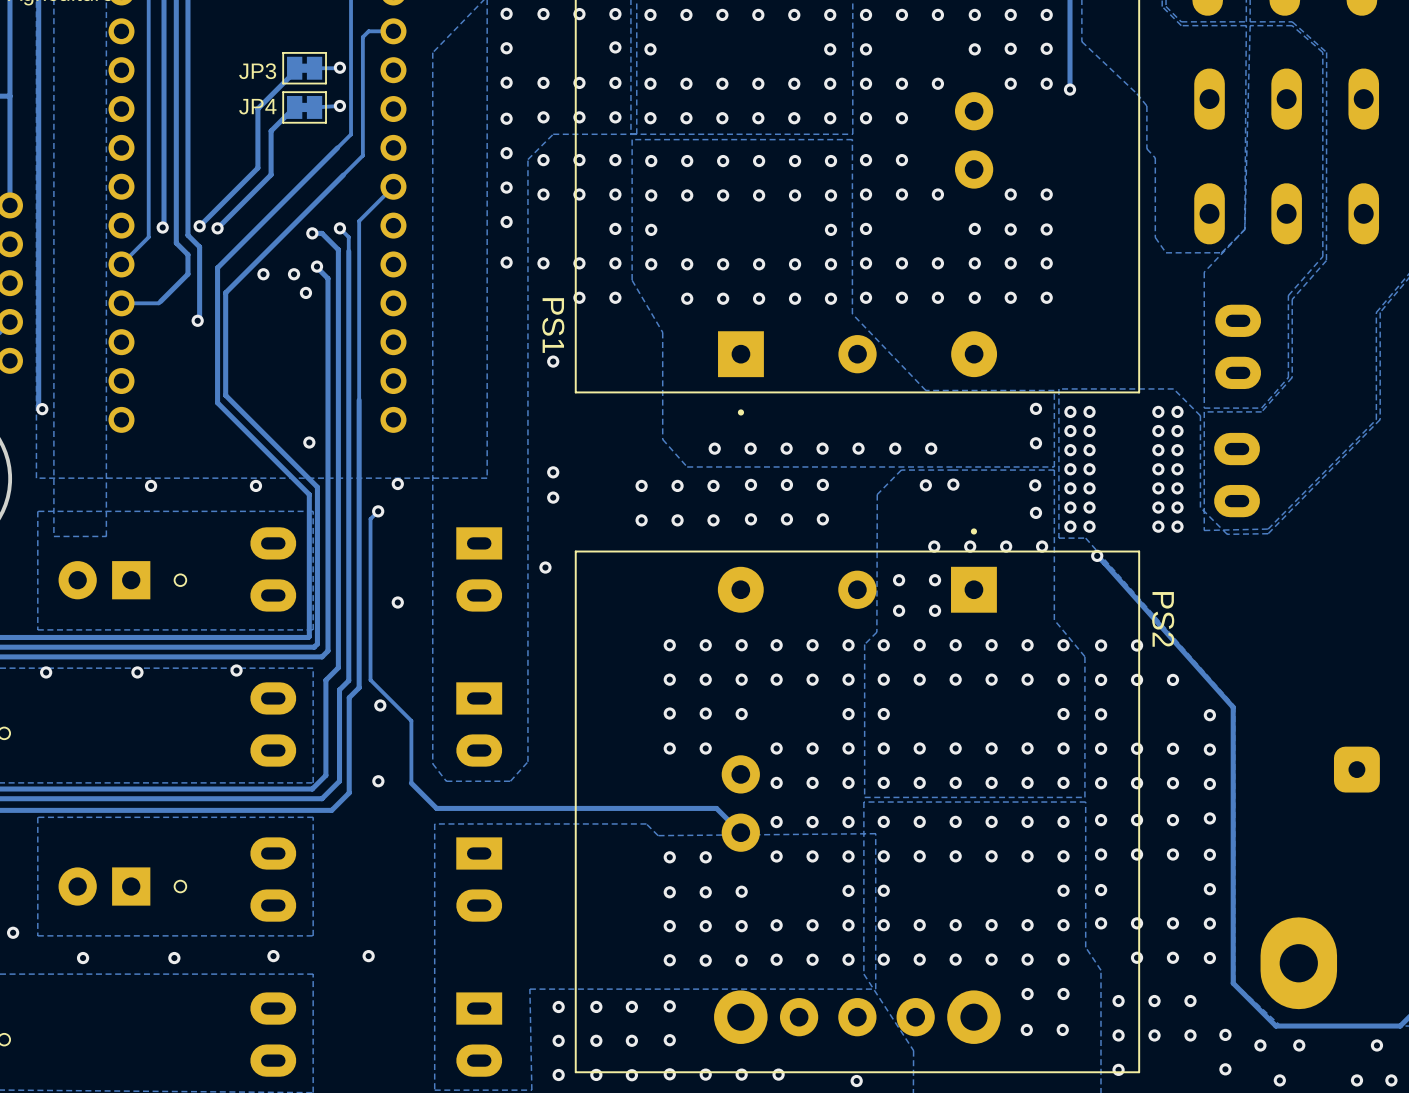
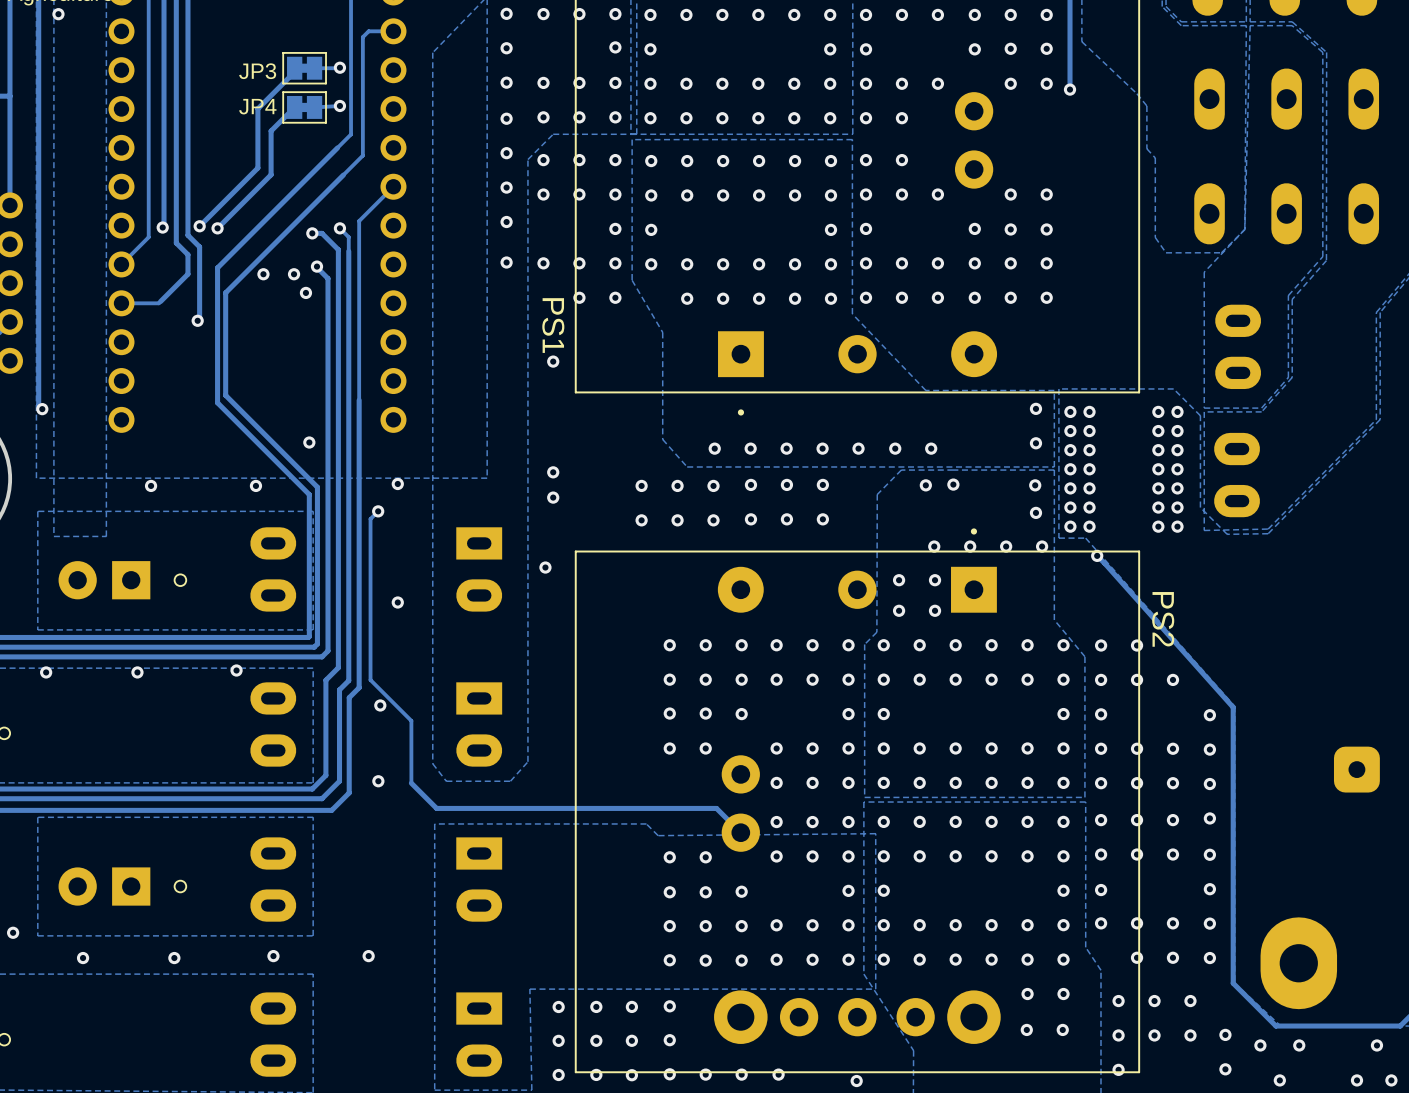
via: none -> (58, 14)

